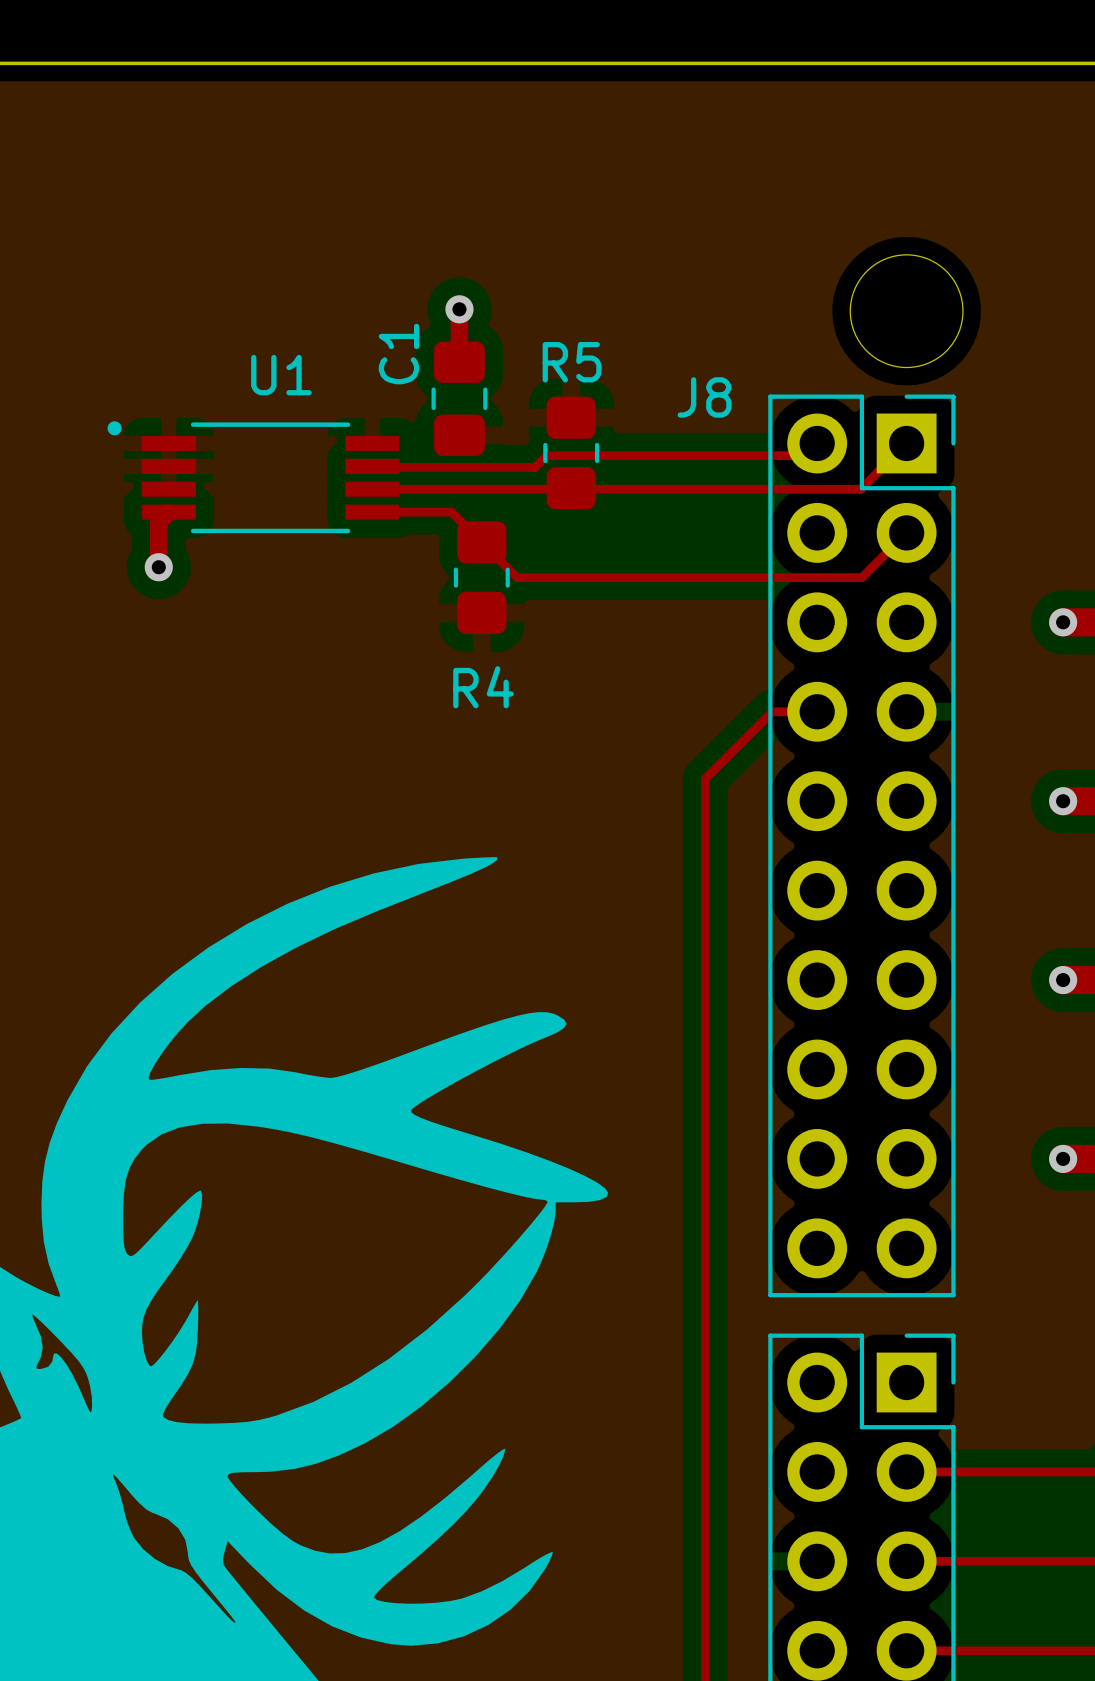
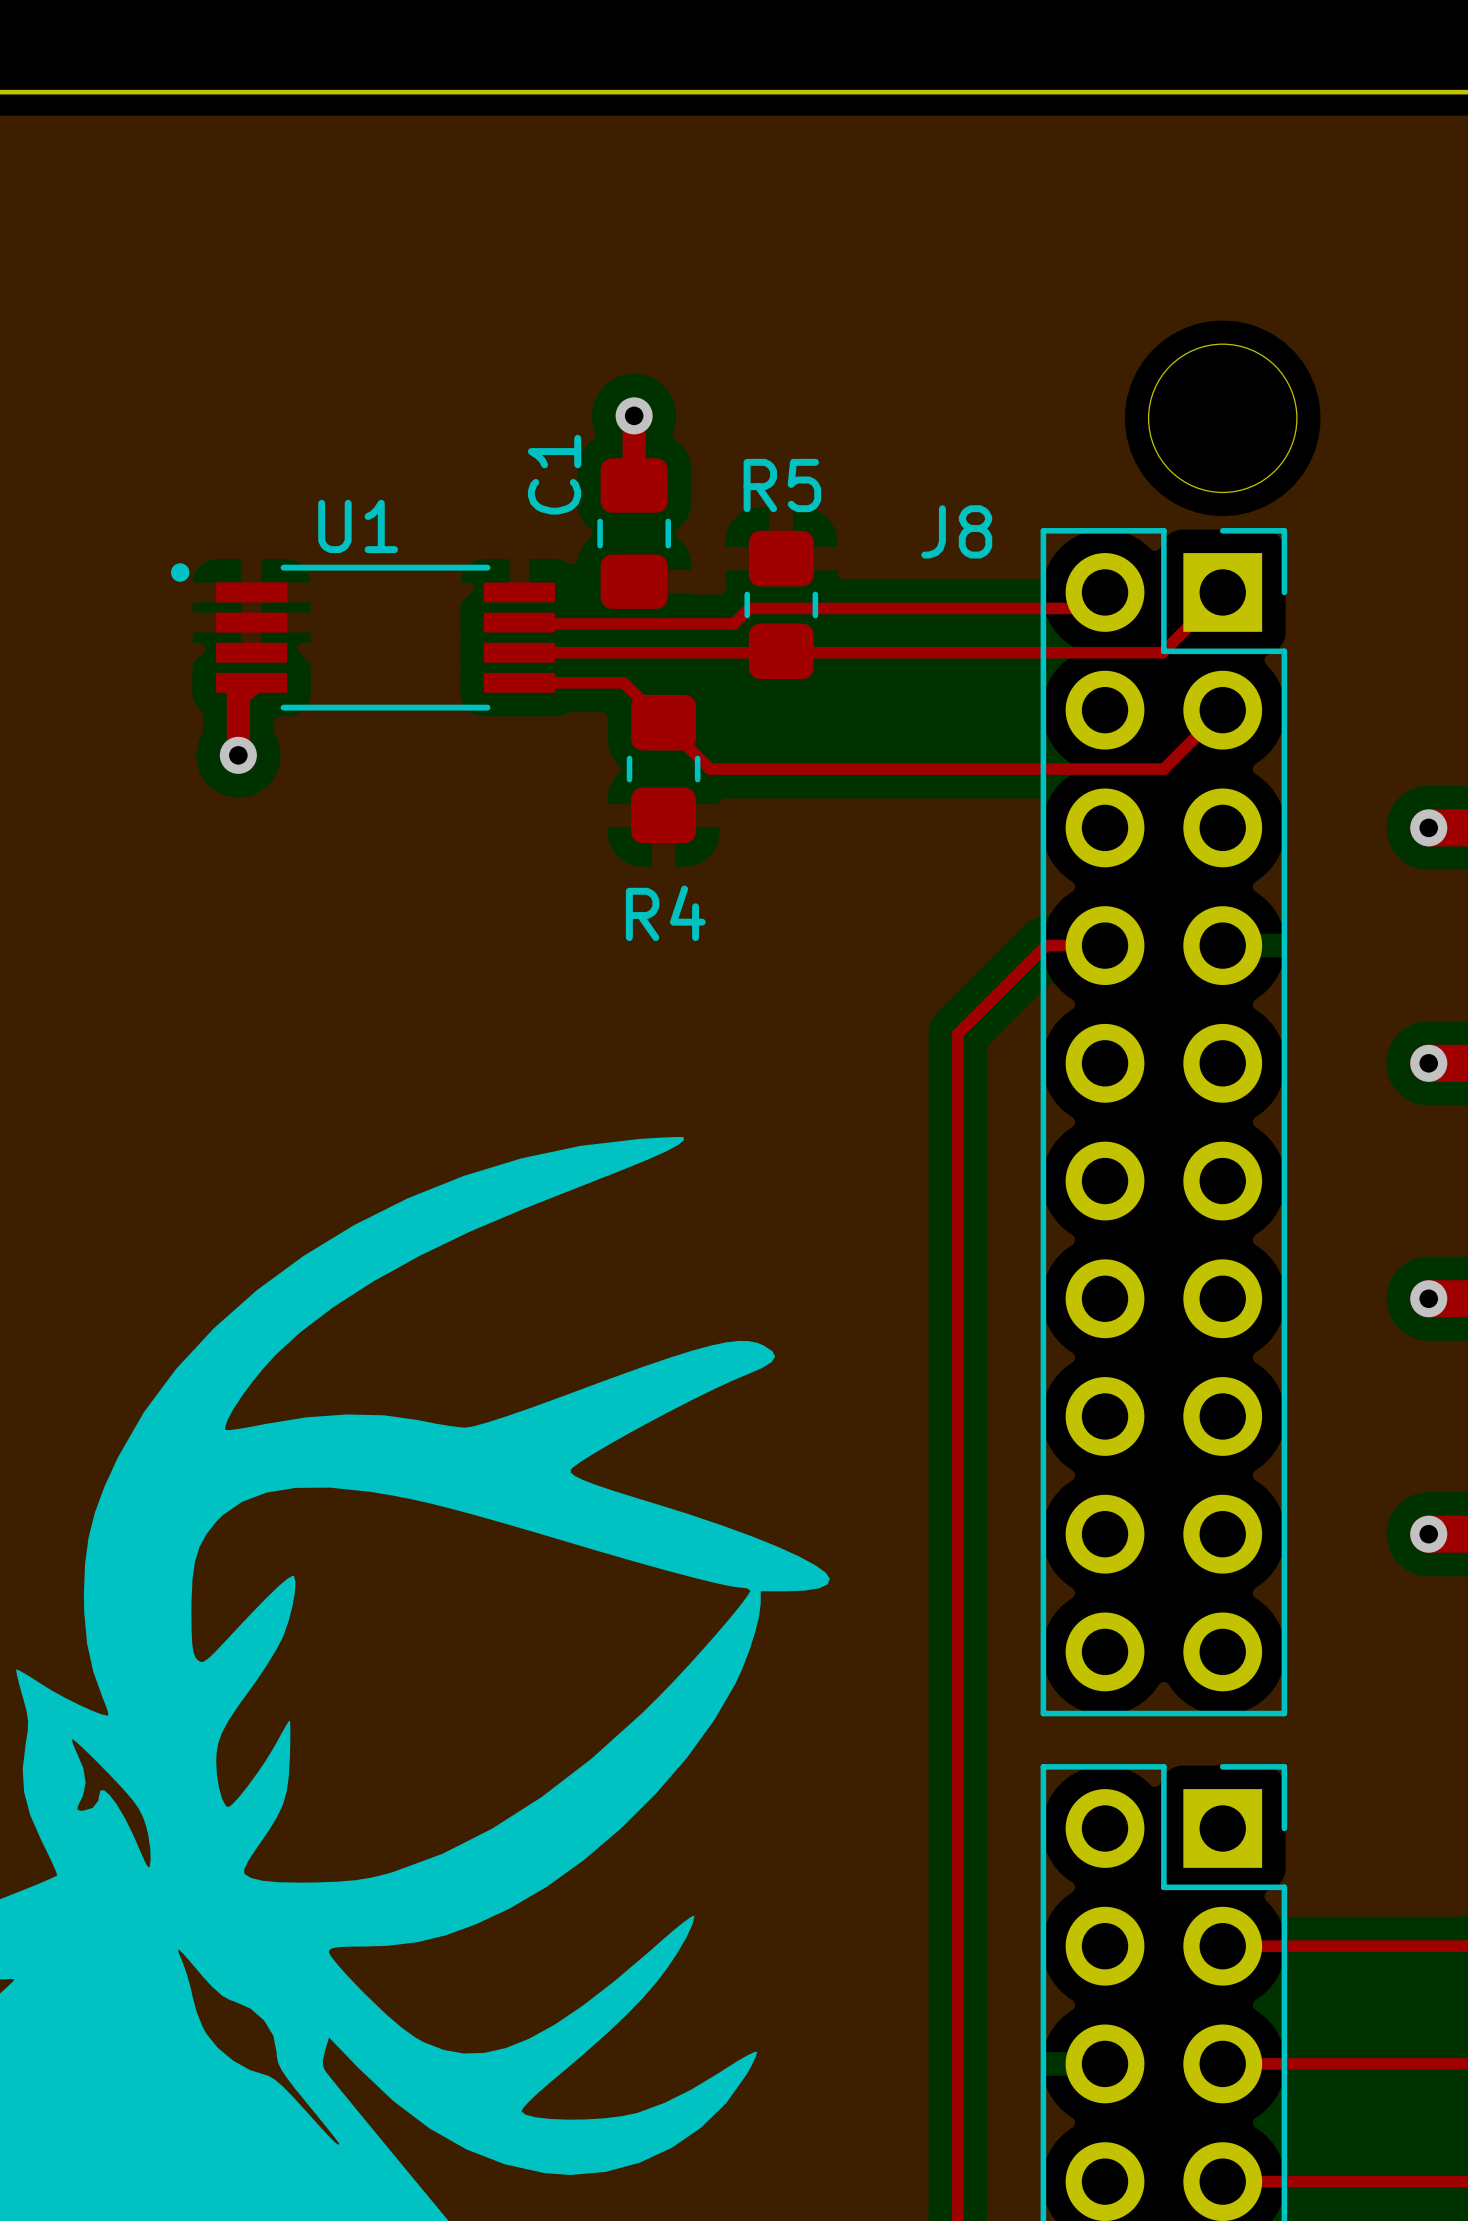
U1 name position: U1 (281, 375) -> U1 (358, 526)

